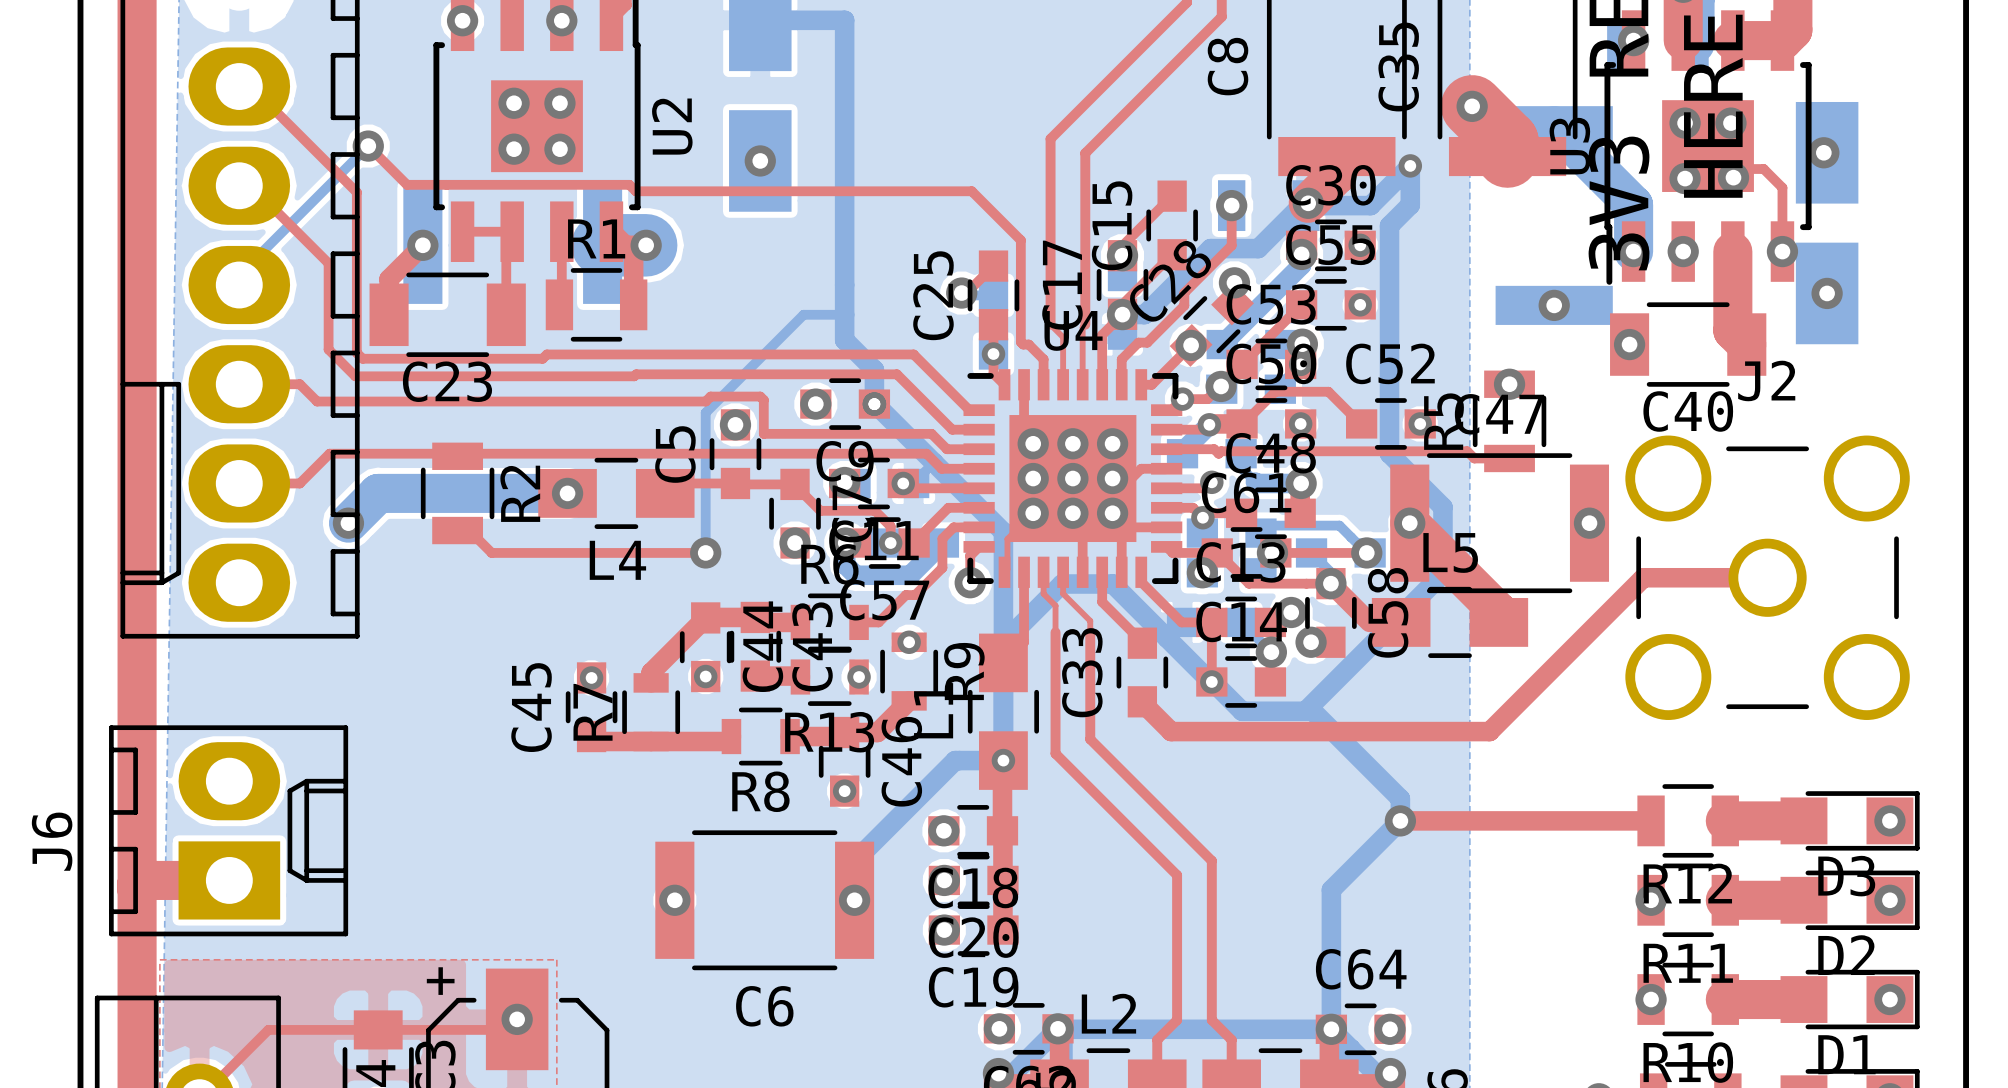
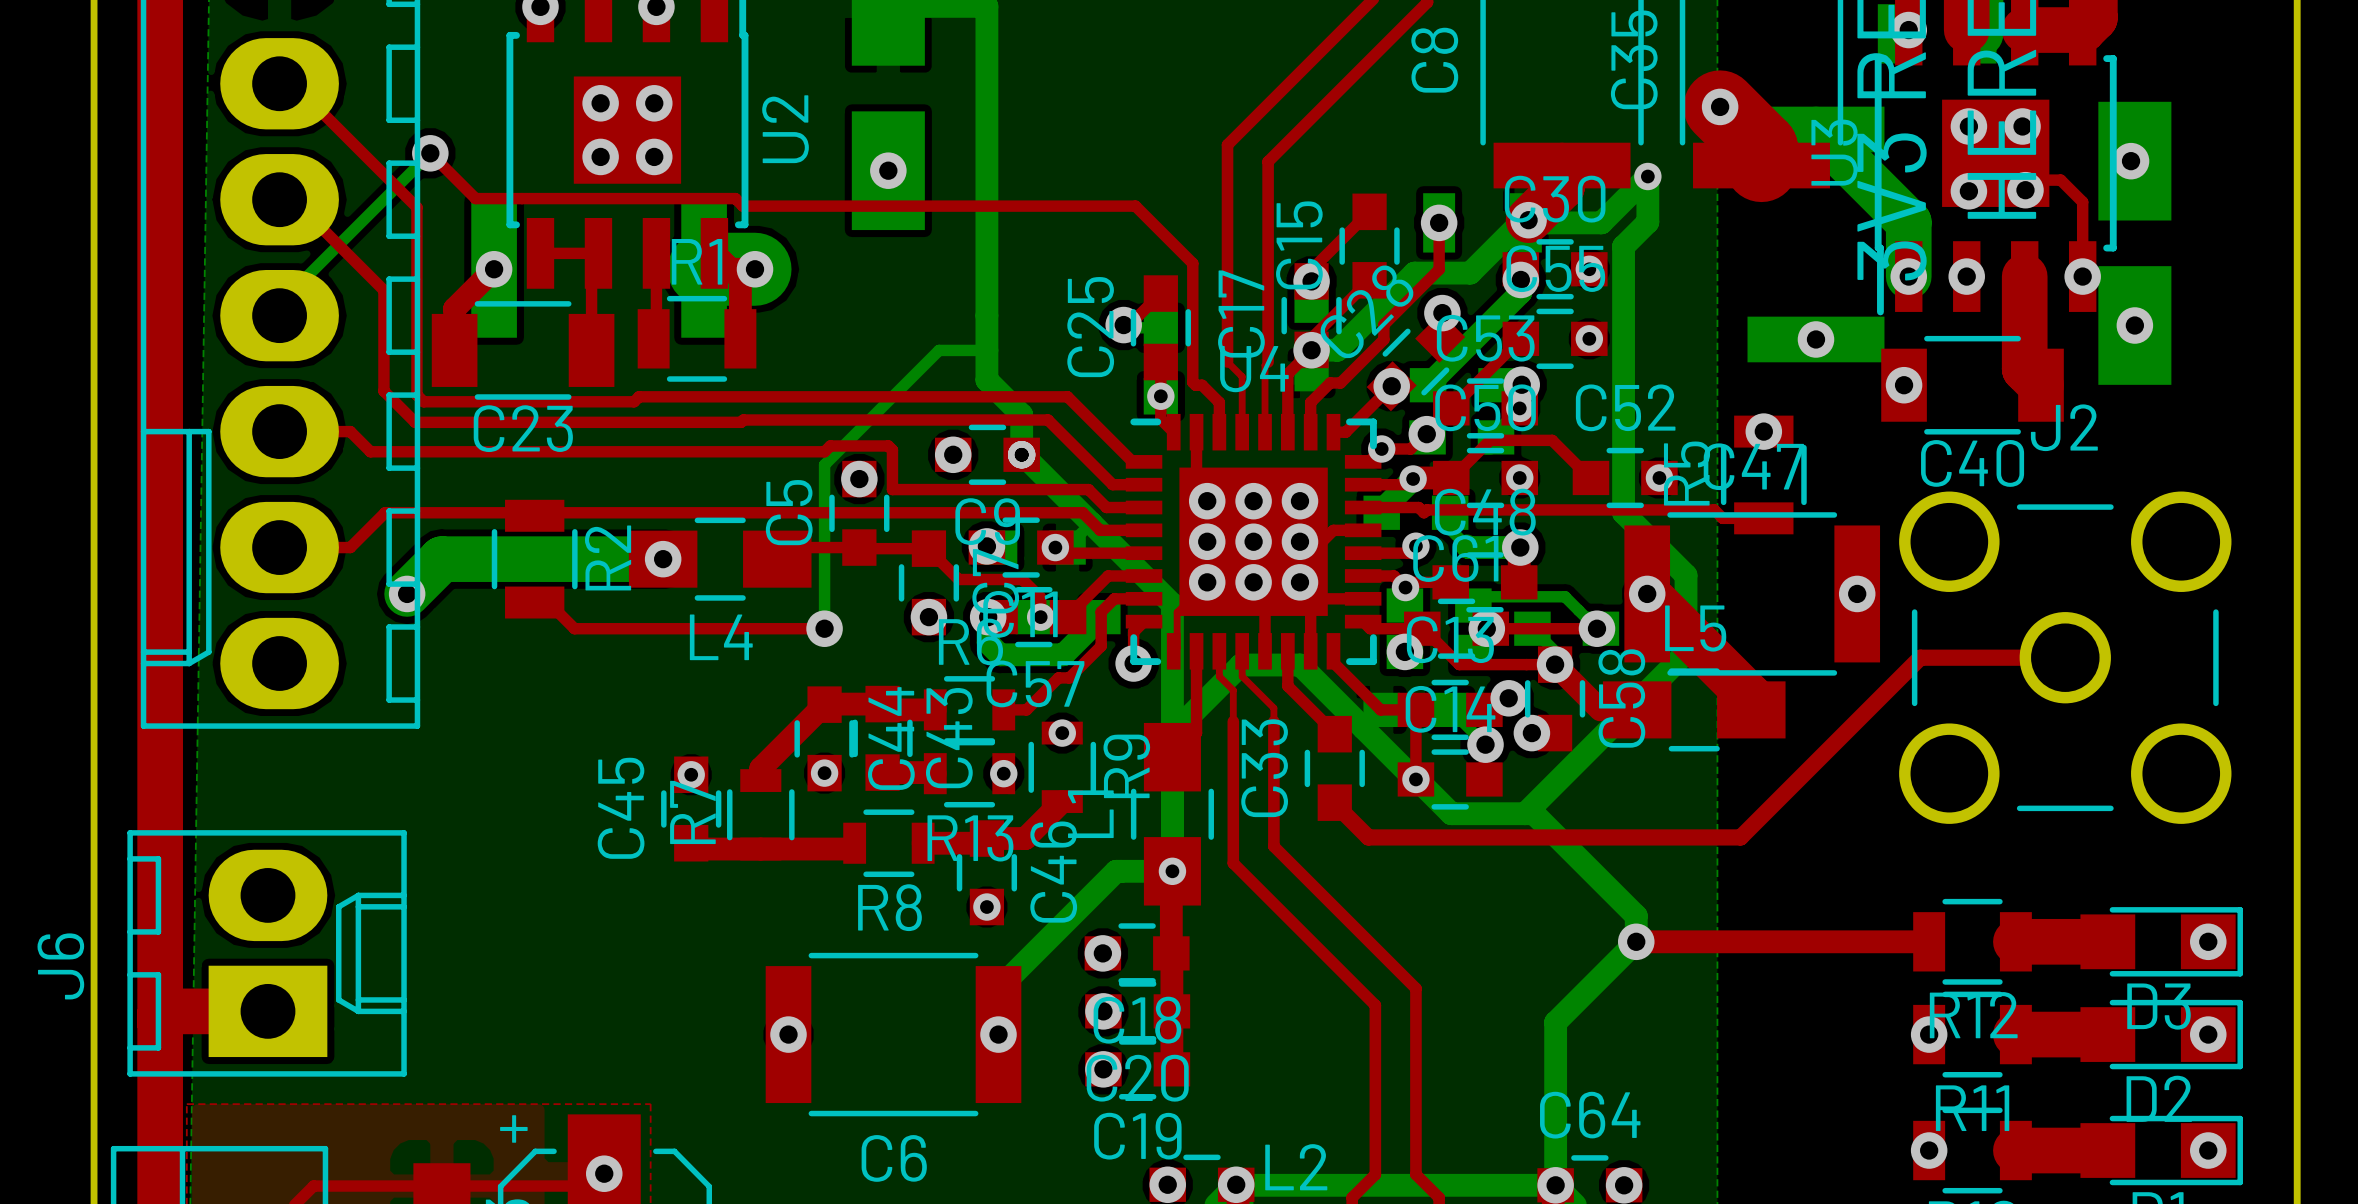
top track width: thick (1767, 577) (1643, 577) (1489, 731) (1171, 731) (1142, 701) -> thin (2065, 657) (1920, 657) (1740, 837) (1368, 837) (1334, 802)

